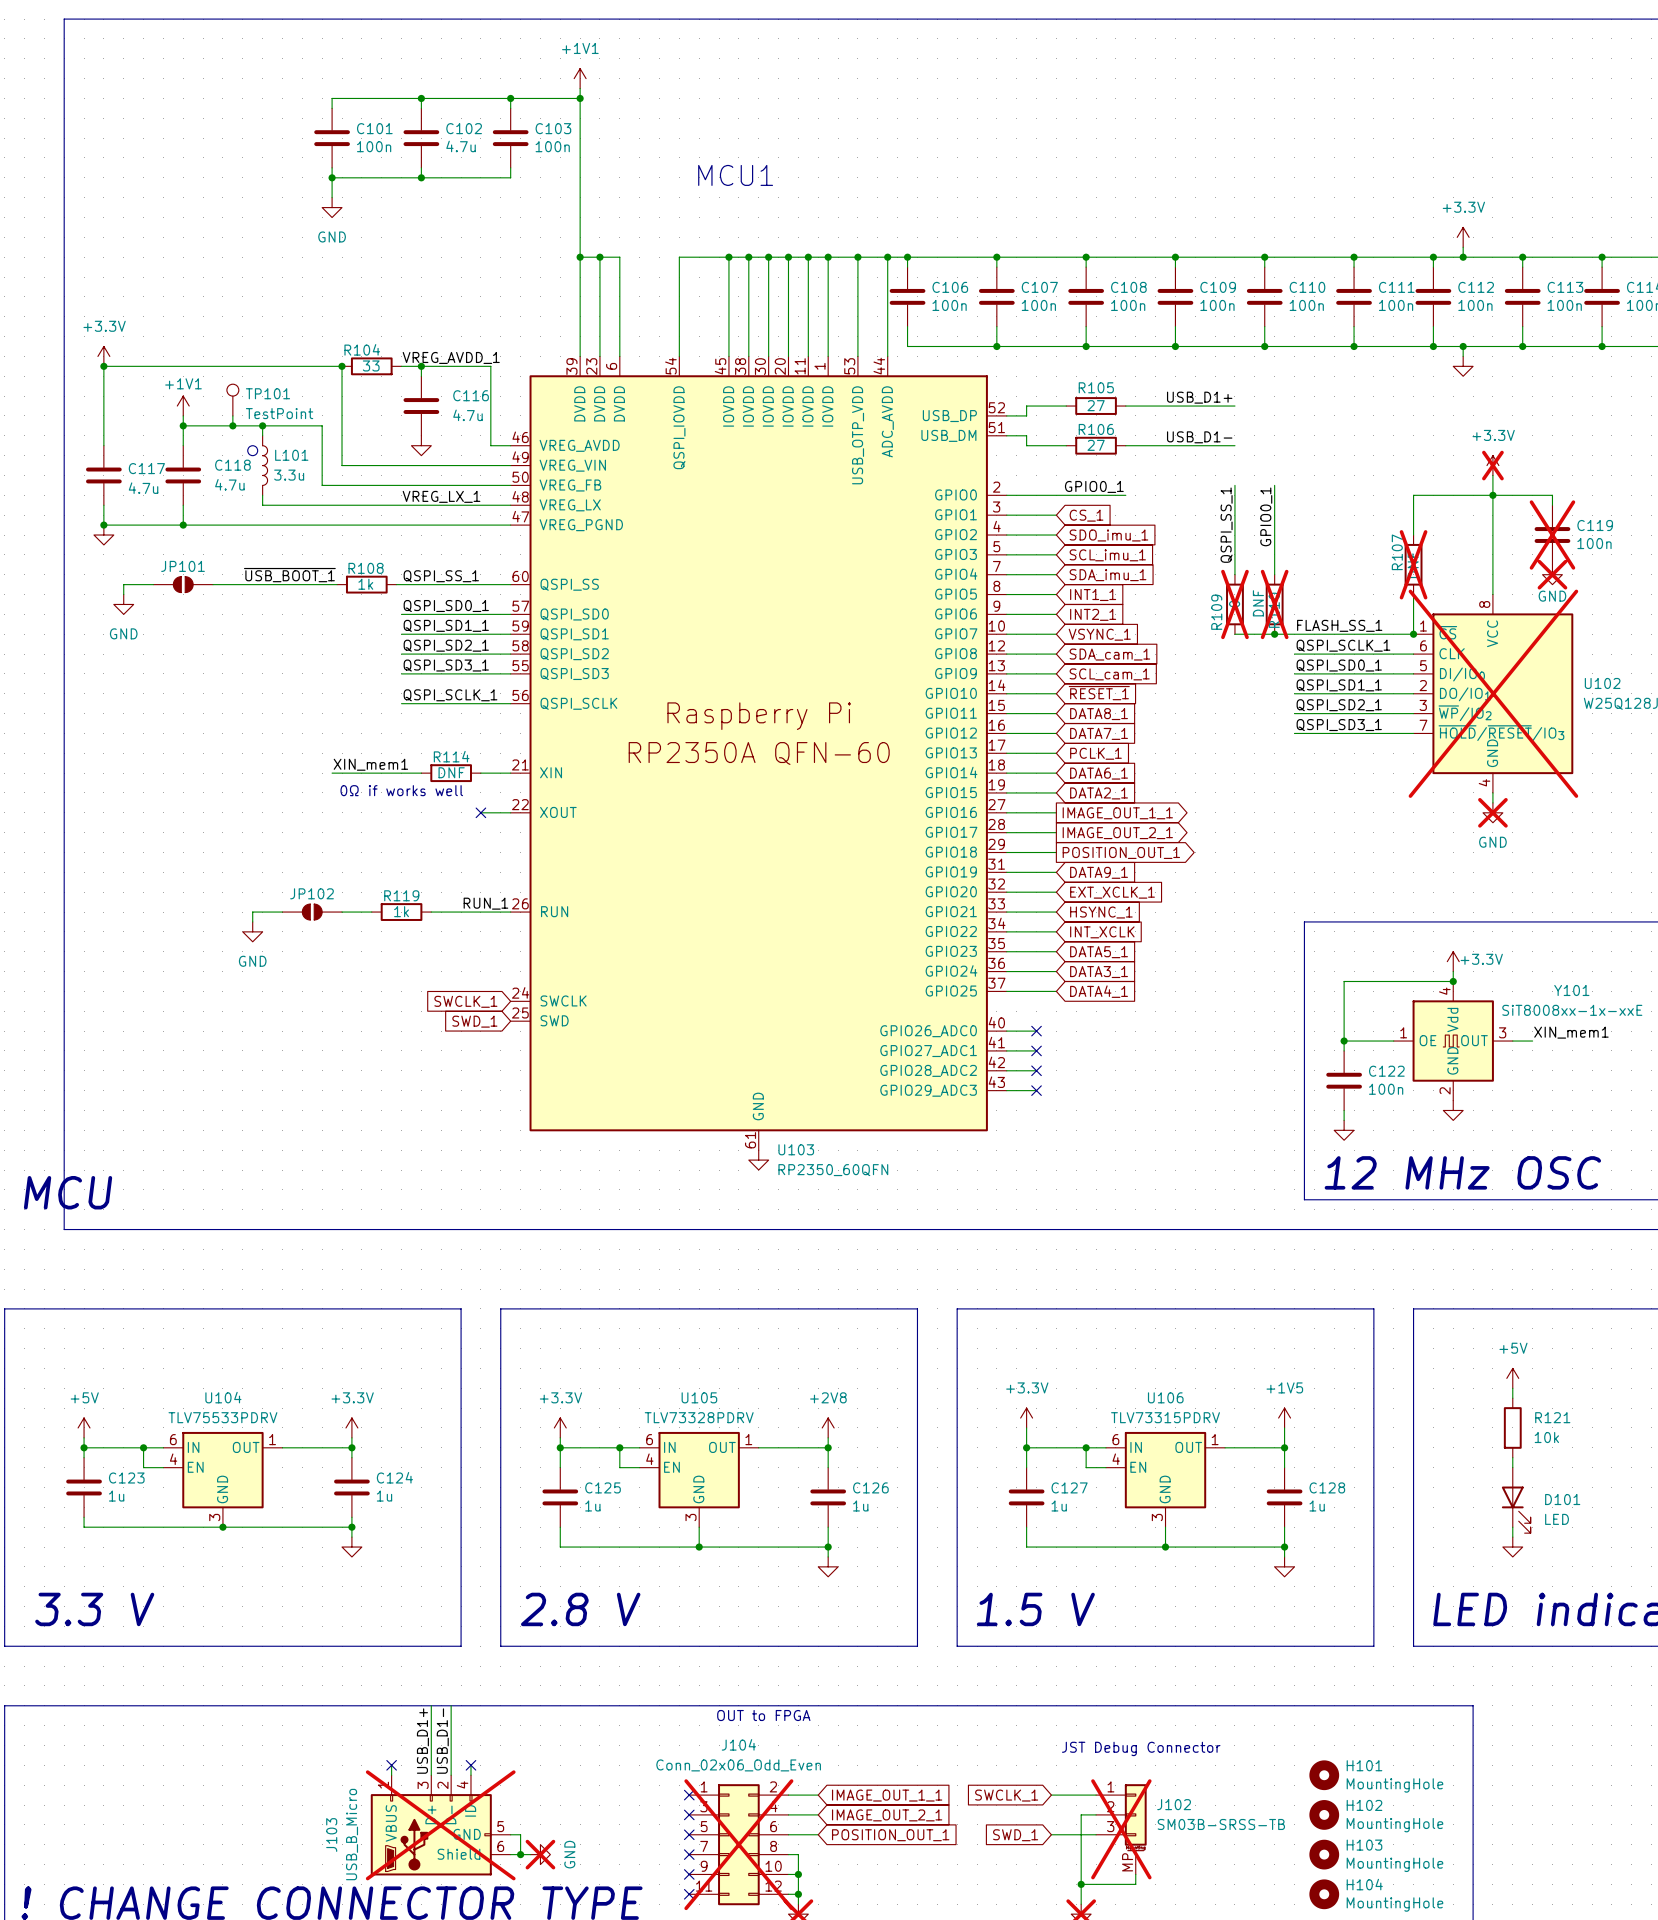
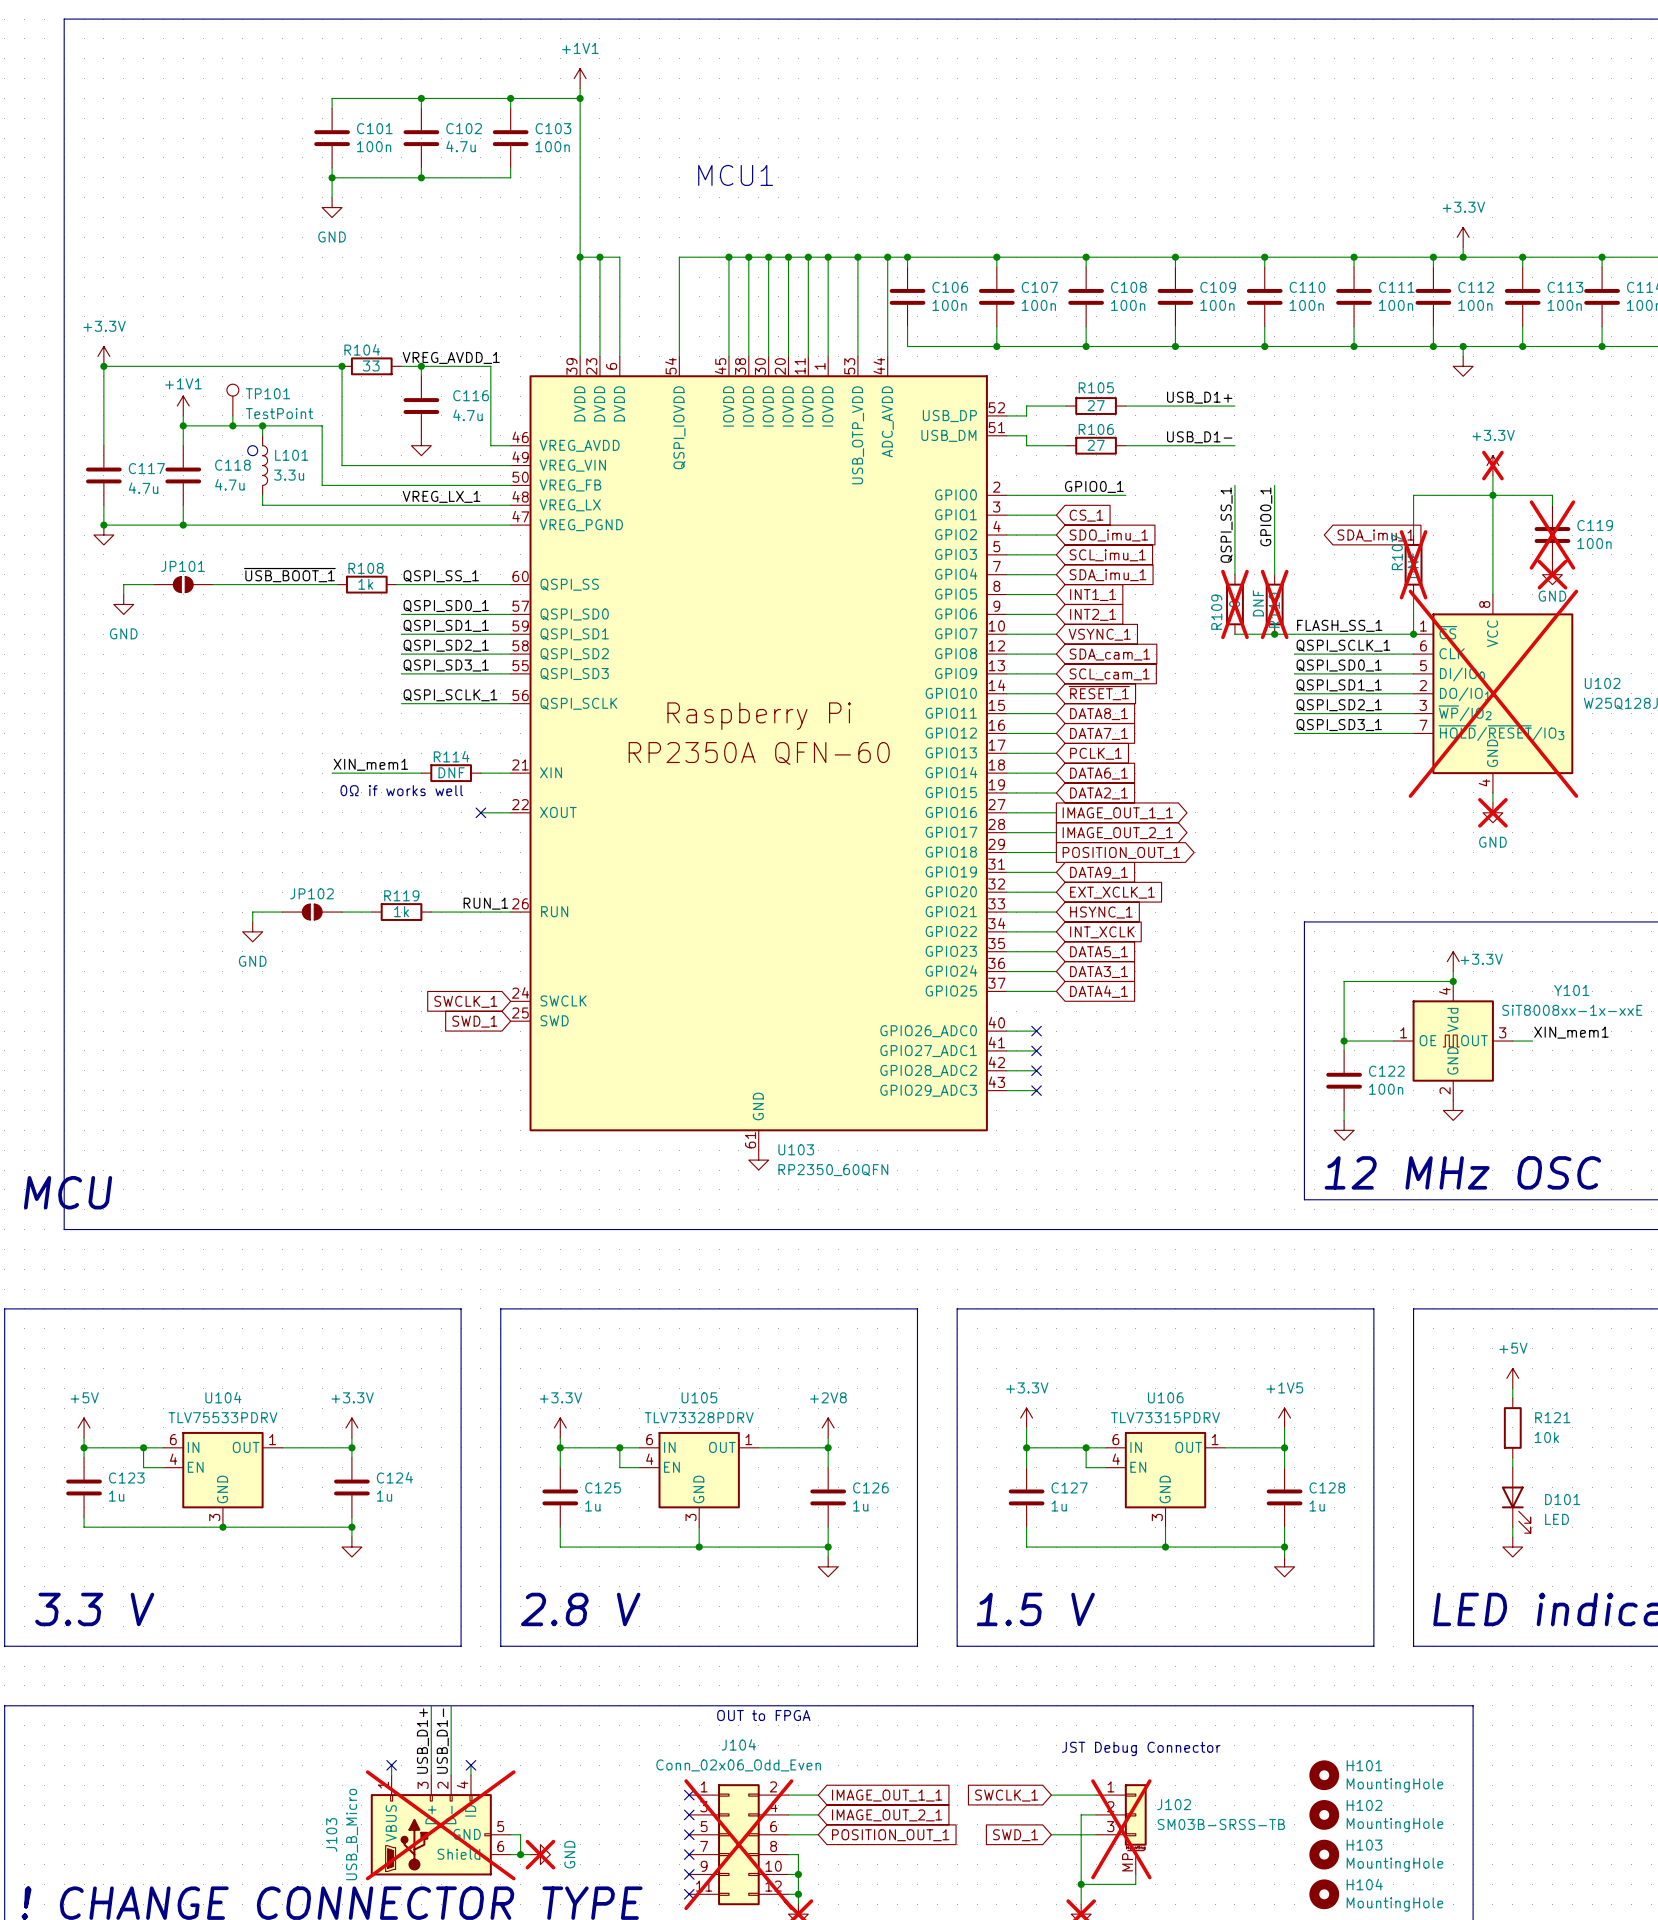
global label: none -> SDA_imu_1 (1375, 535)

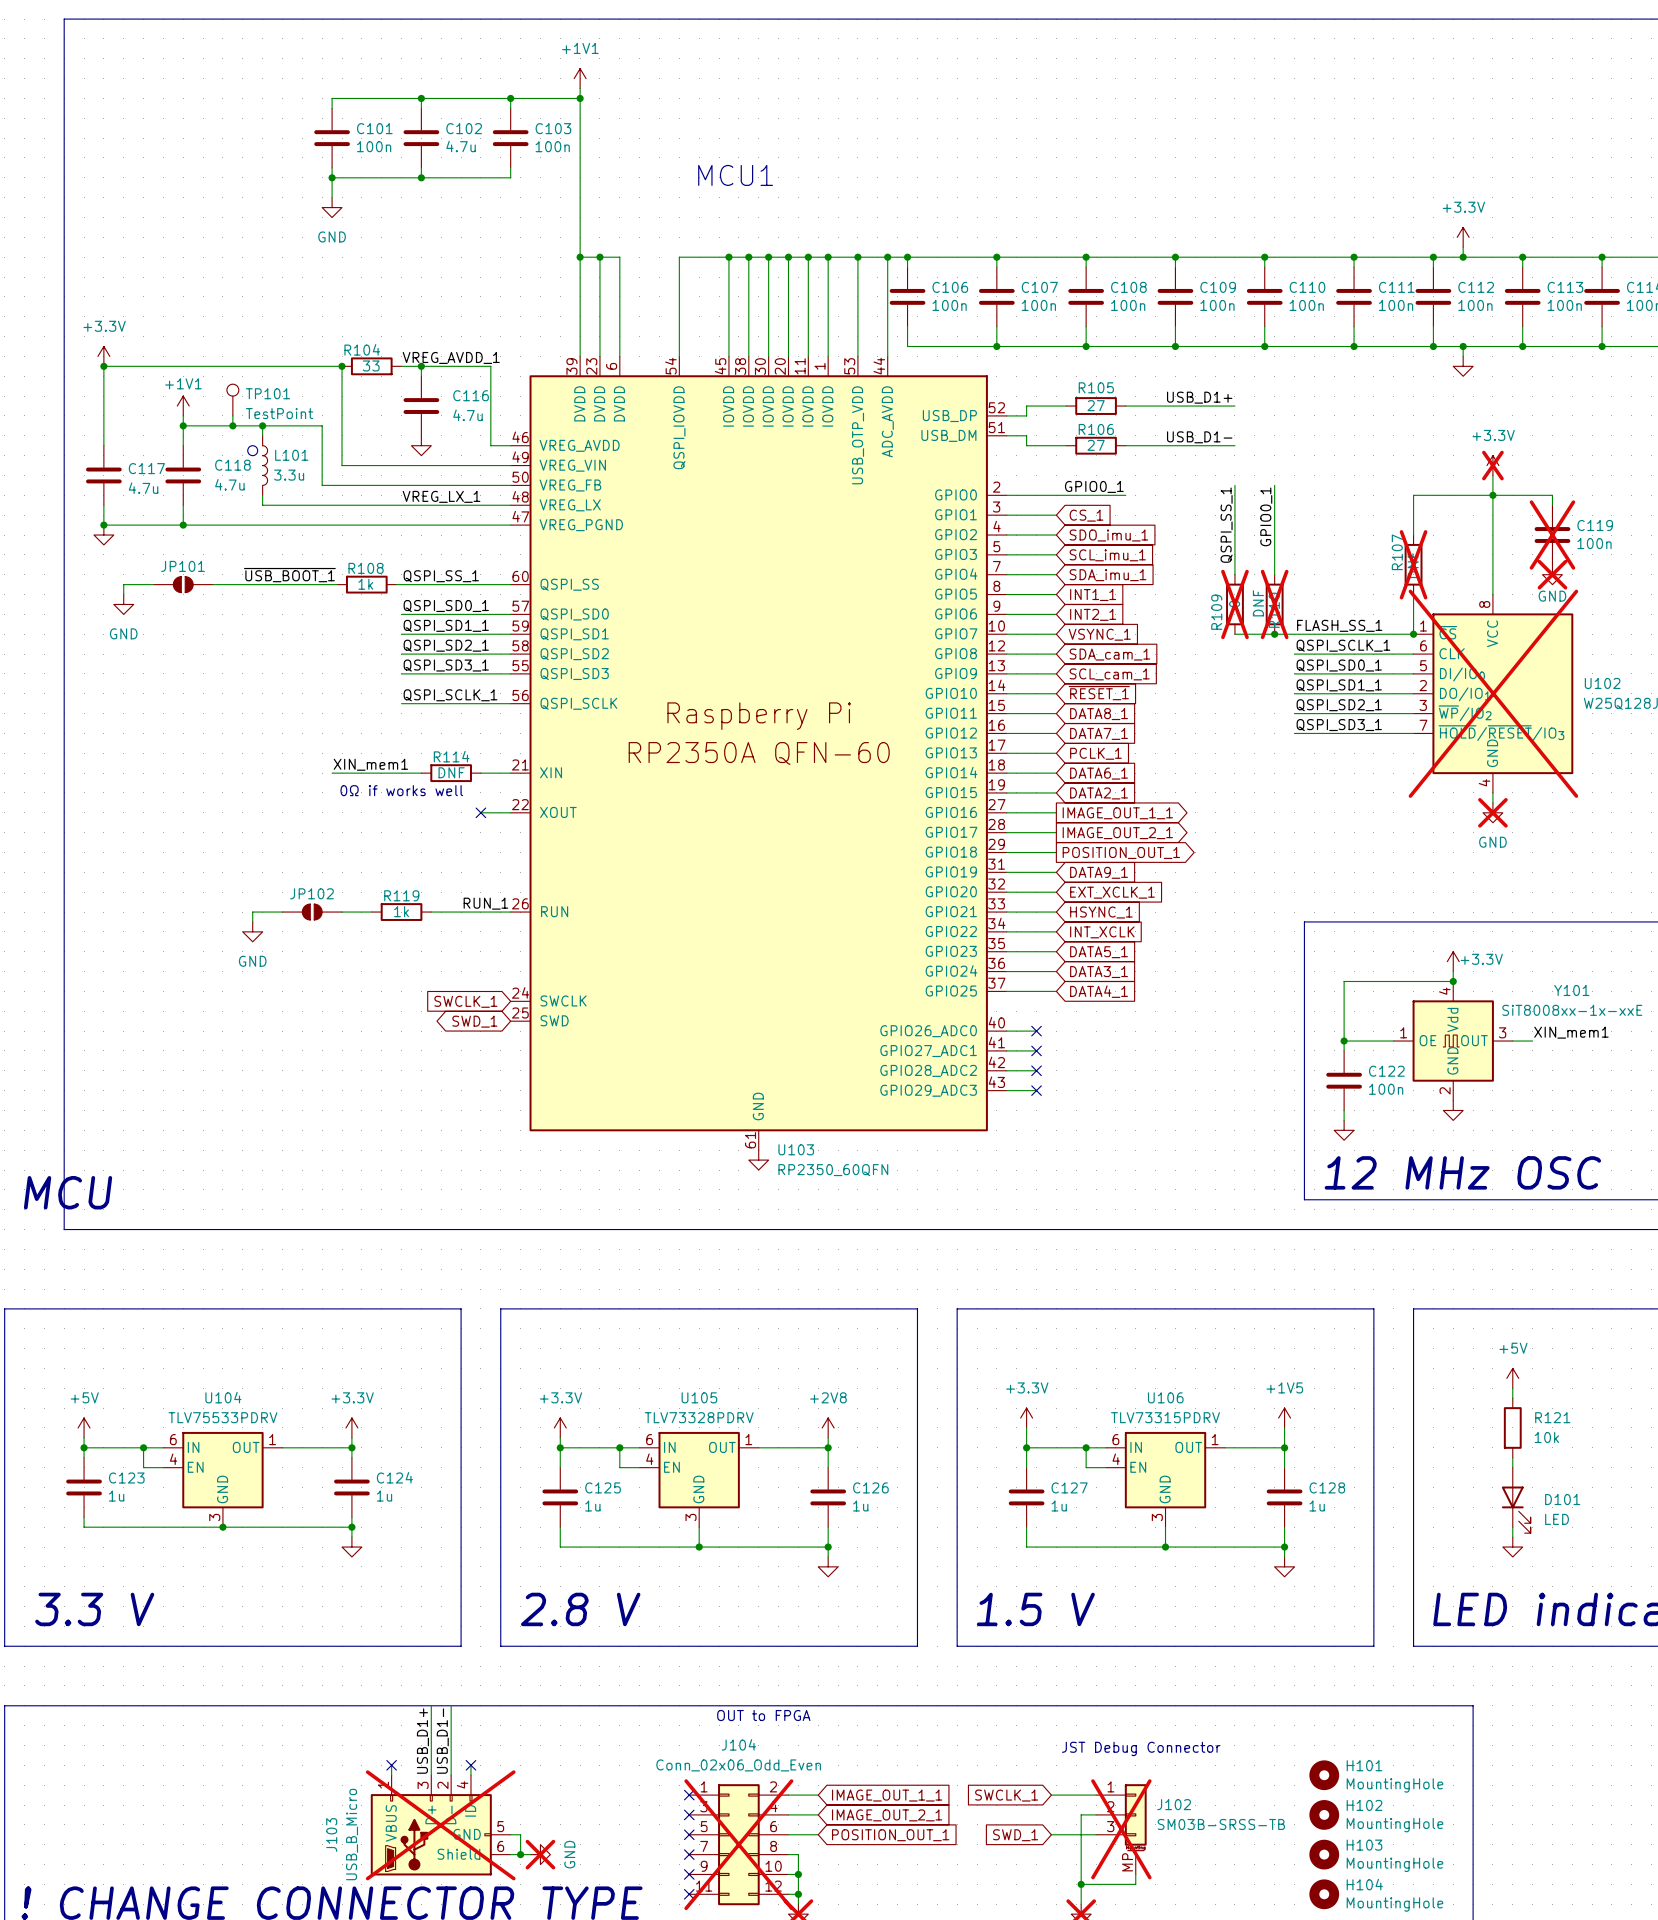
global label: SDA_imu_1 (1375, 535) -> none
global label shape: input (474, 1021) -> bidirectional (474, 1021)

